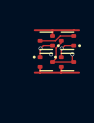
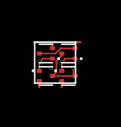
line: none -> (34, 42) (75, 42) (75, 83) (34, 83) (34, 42)
top track: (34, 72) (79, 72) -> none

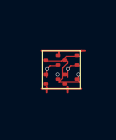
part footprint: [36, 43, 61, 64] -> [43, 53, 61, 67]
part footprint: [59, 43, 83, 64] -> [62, 53, 80, 67]
part footprint: [31, 66, 56, 86] -> [43, 72, 61, 86]
part footprint: [54, 66, 78, 86] -> [62, 72, 80, 86]
top track: none -> (41, 88) (81, 88)

